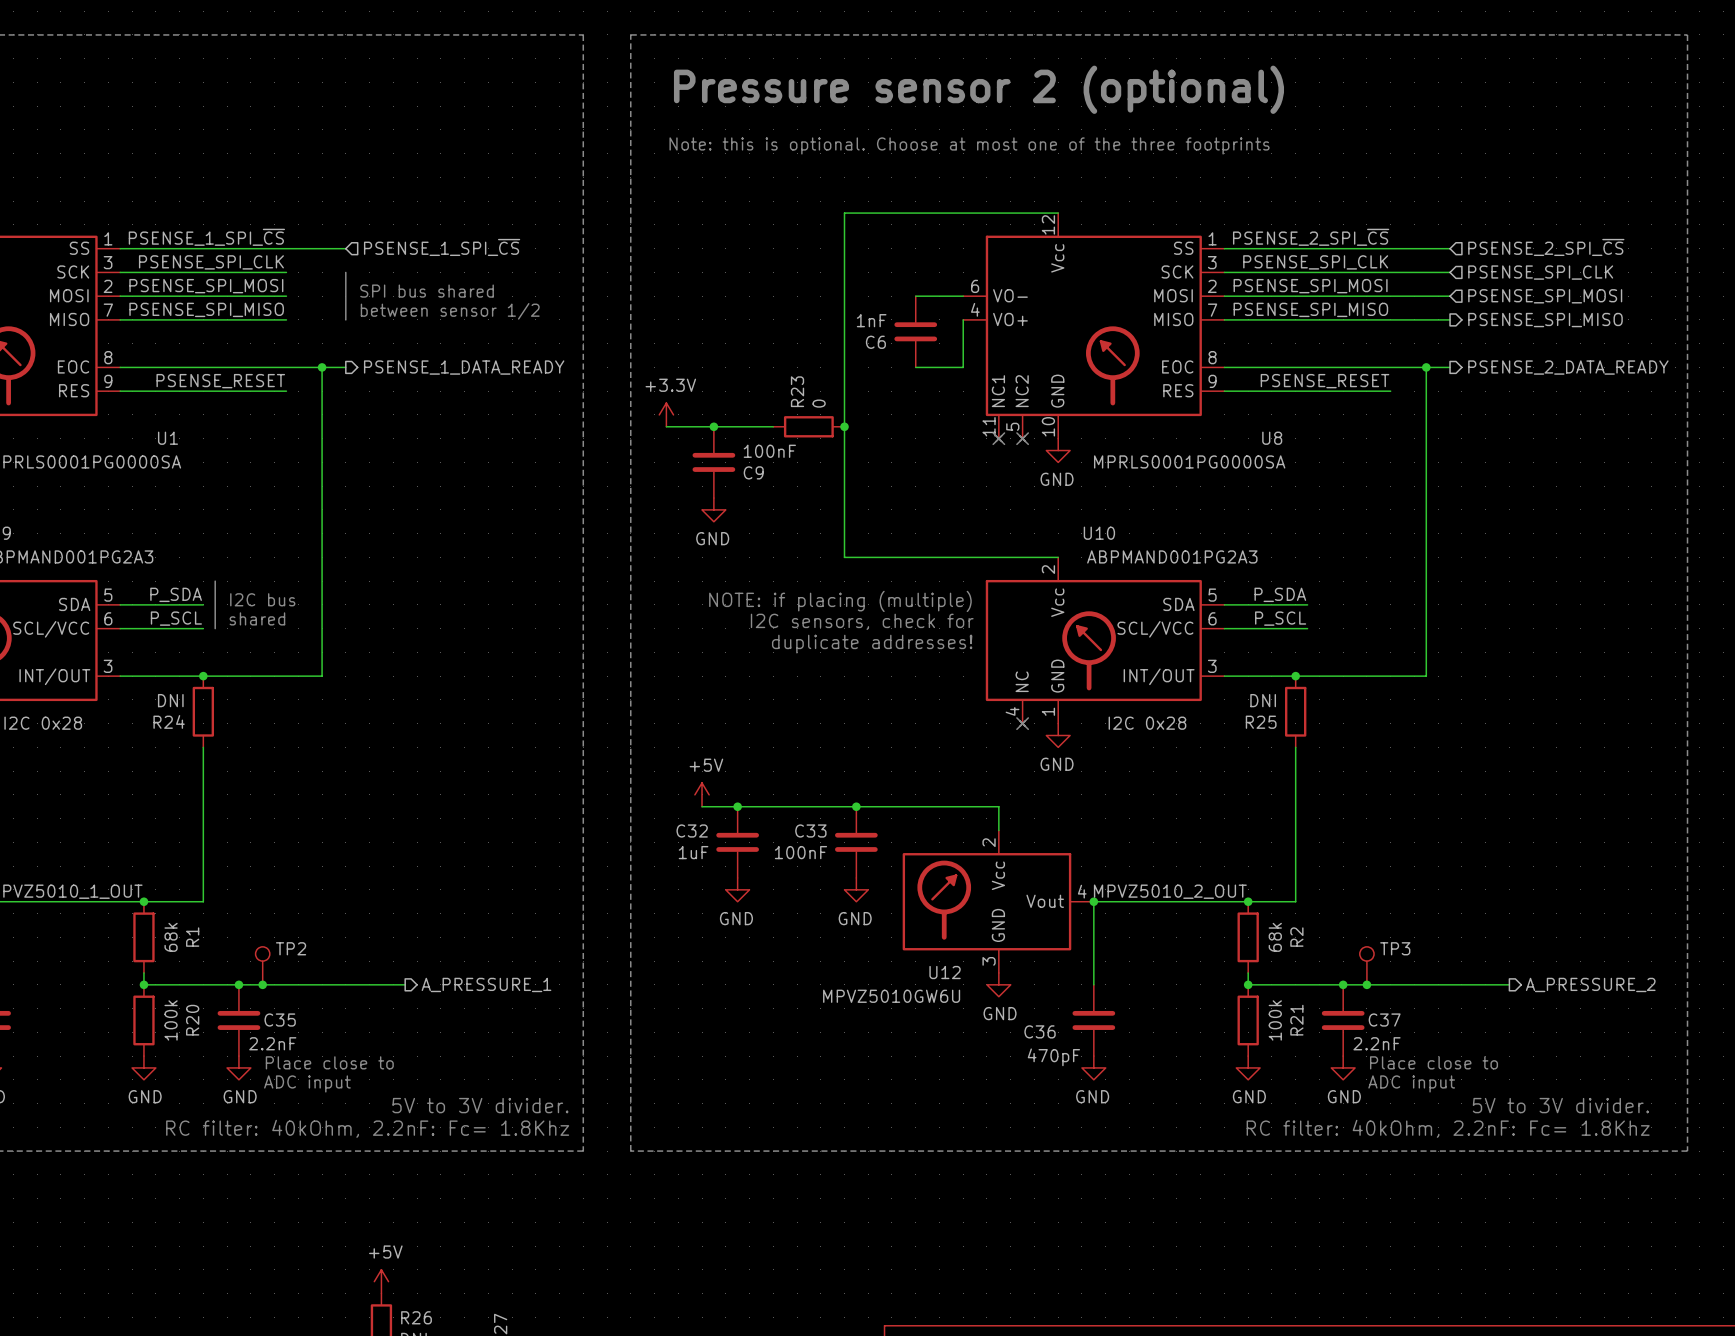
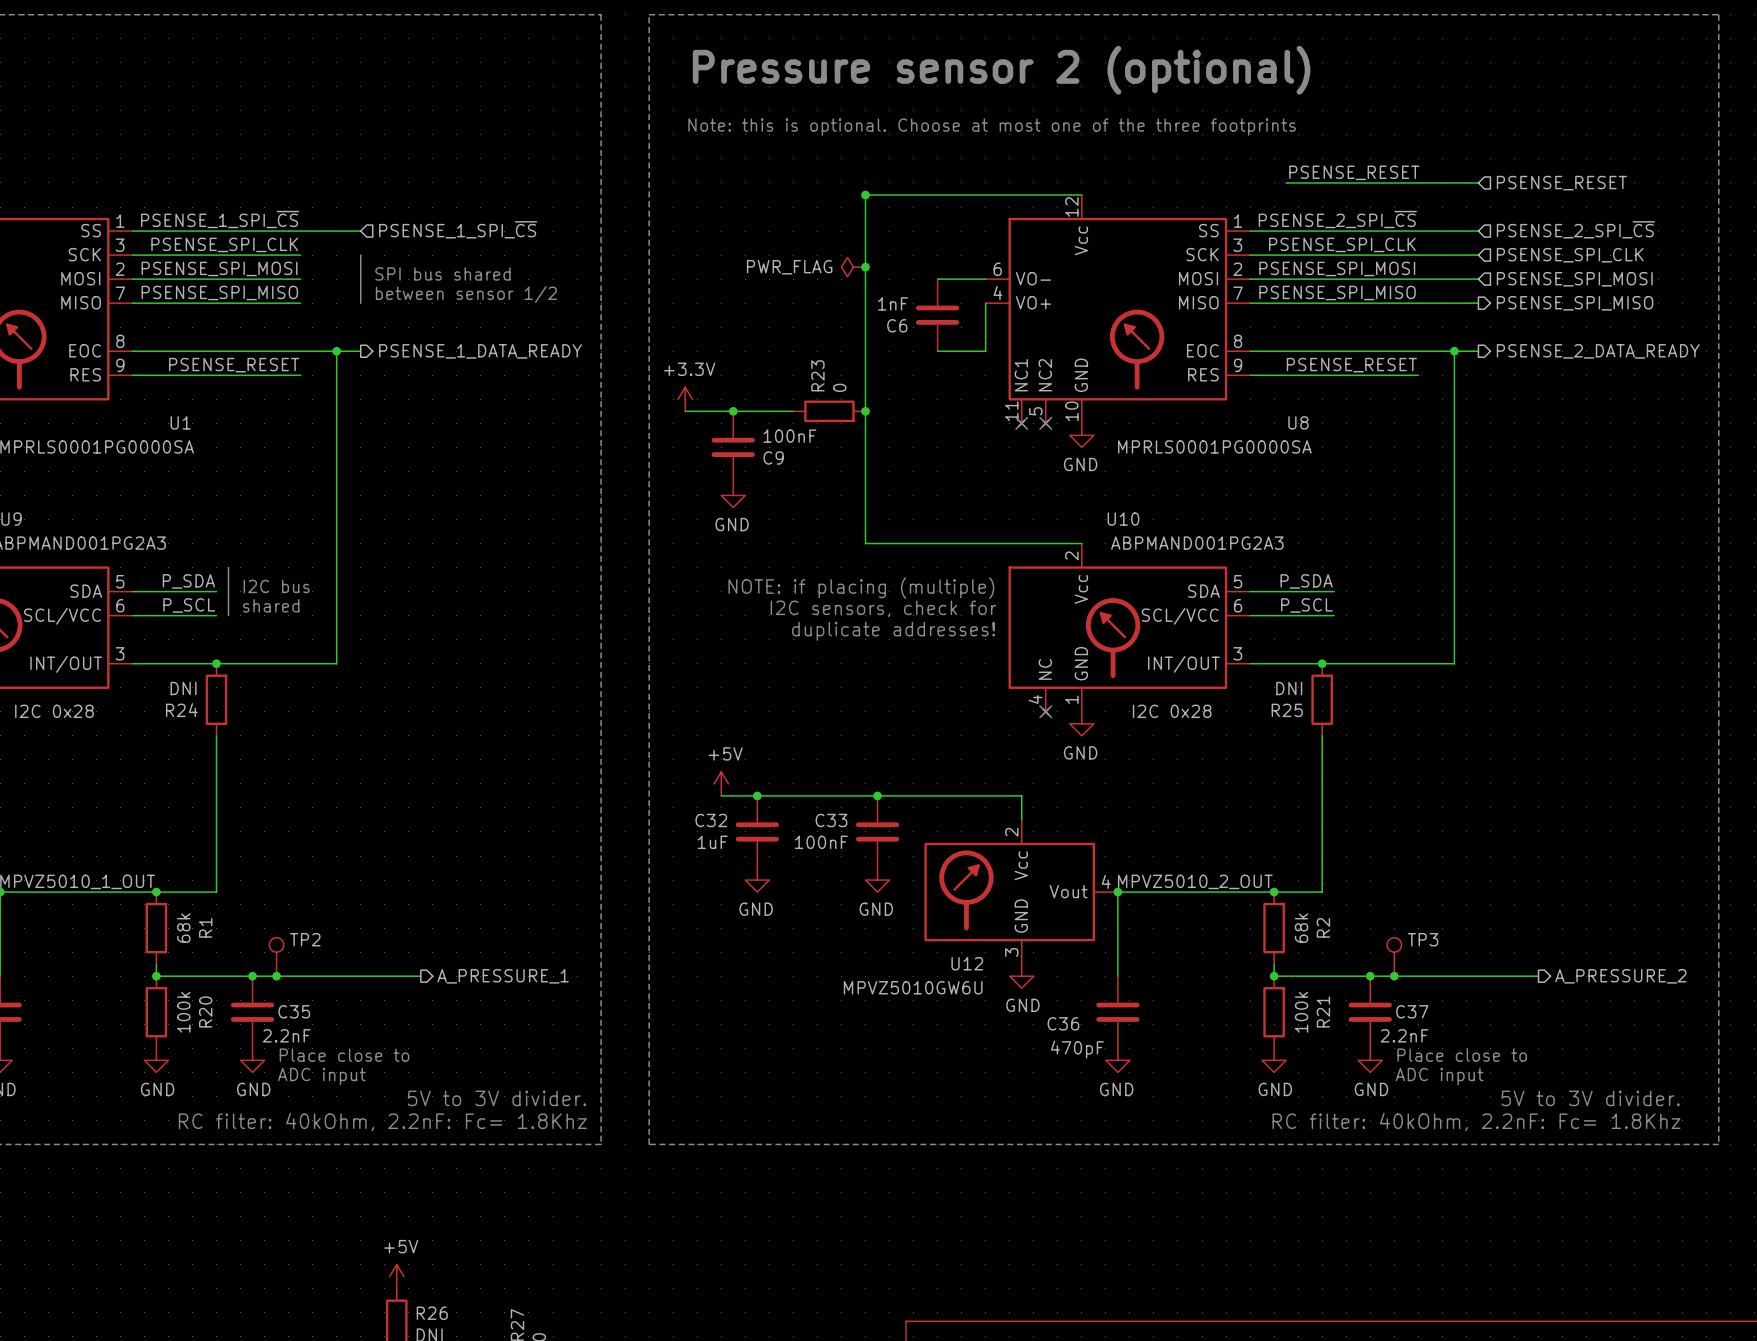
label: none -> PSENSE_RESET (1354, 172)
wire: none -> (1286, 182) (1478, 182)
hierarchical label: none -> PSENSE_RESET (1561, 183)
junction: none -> (865, 195)
power symbol: none -> PWR_FLAG (853, 267)
junction: none -> (865, 267)

